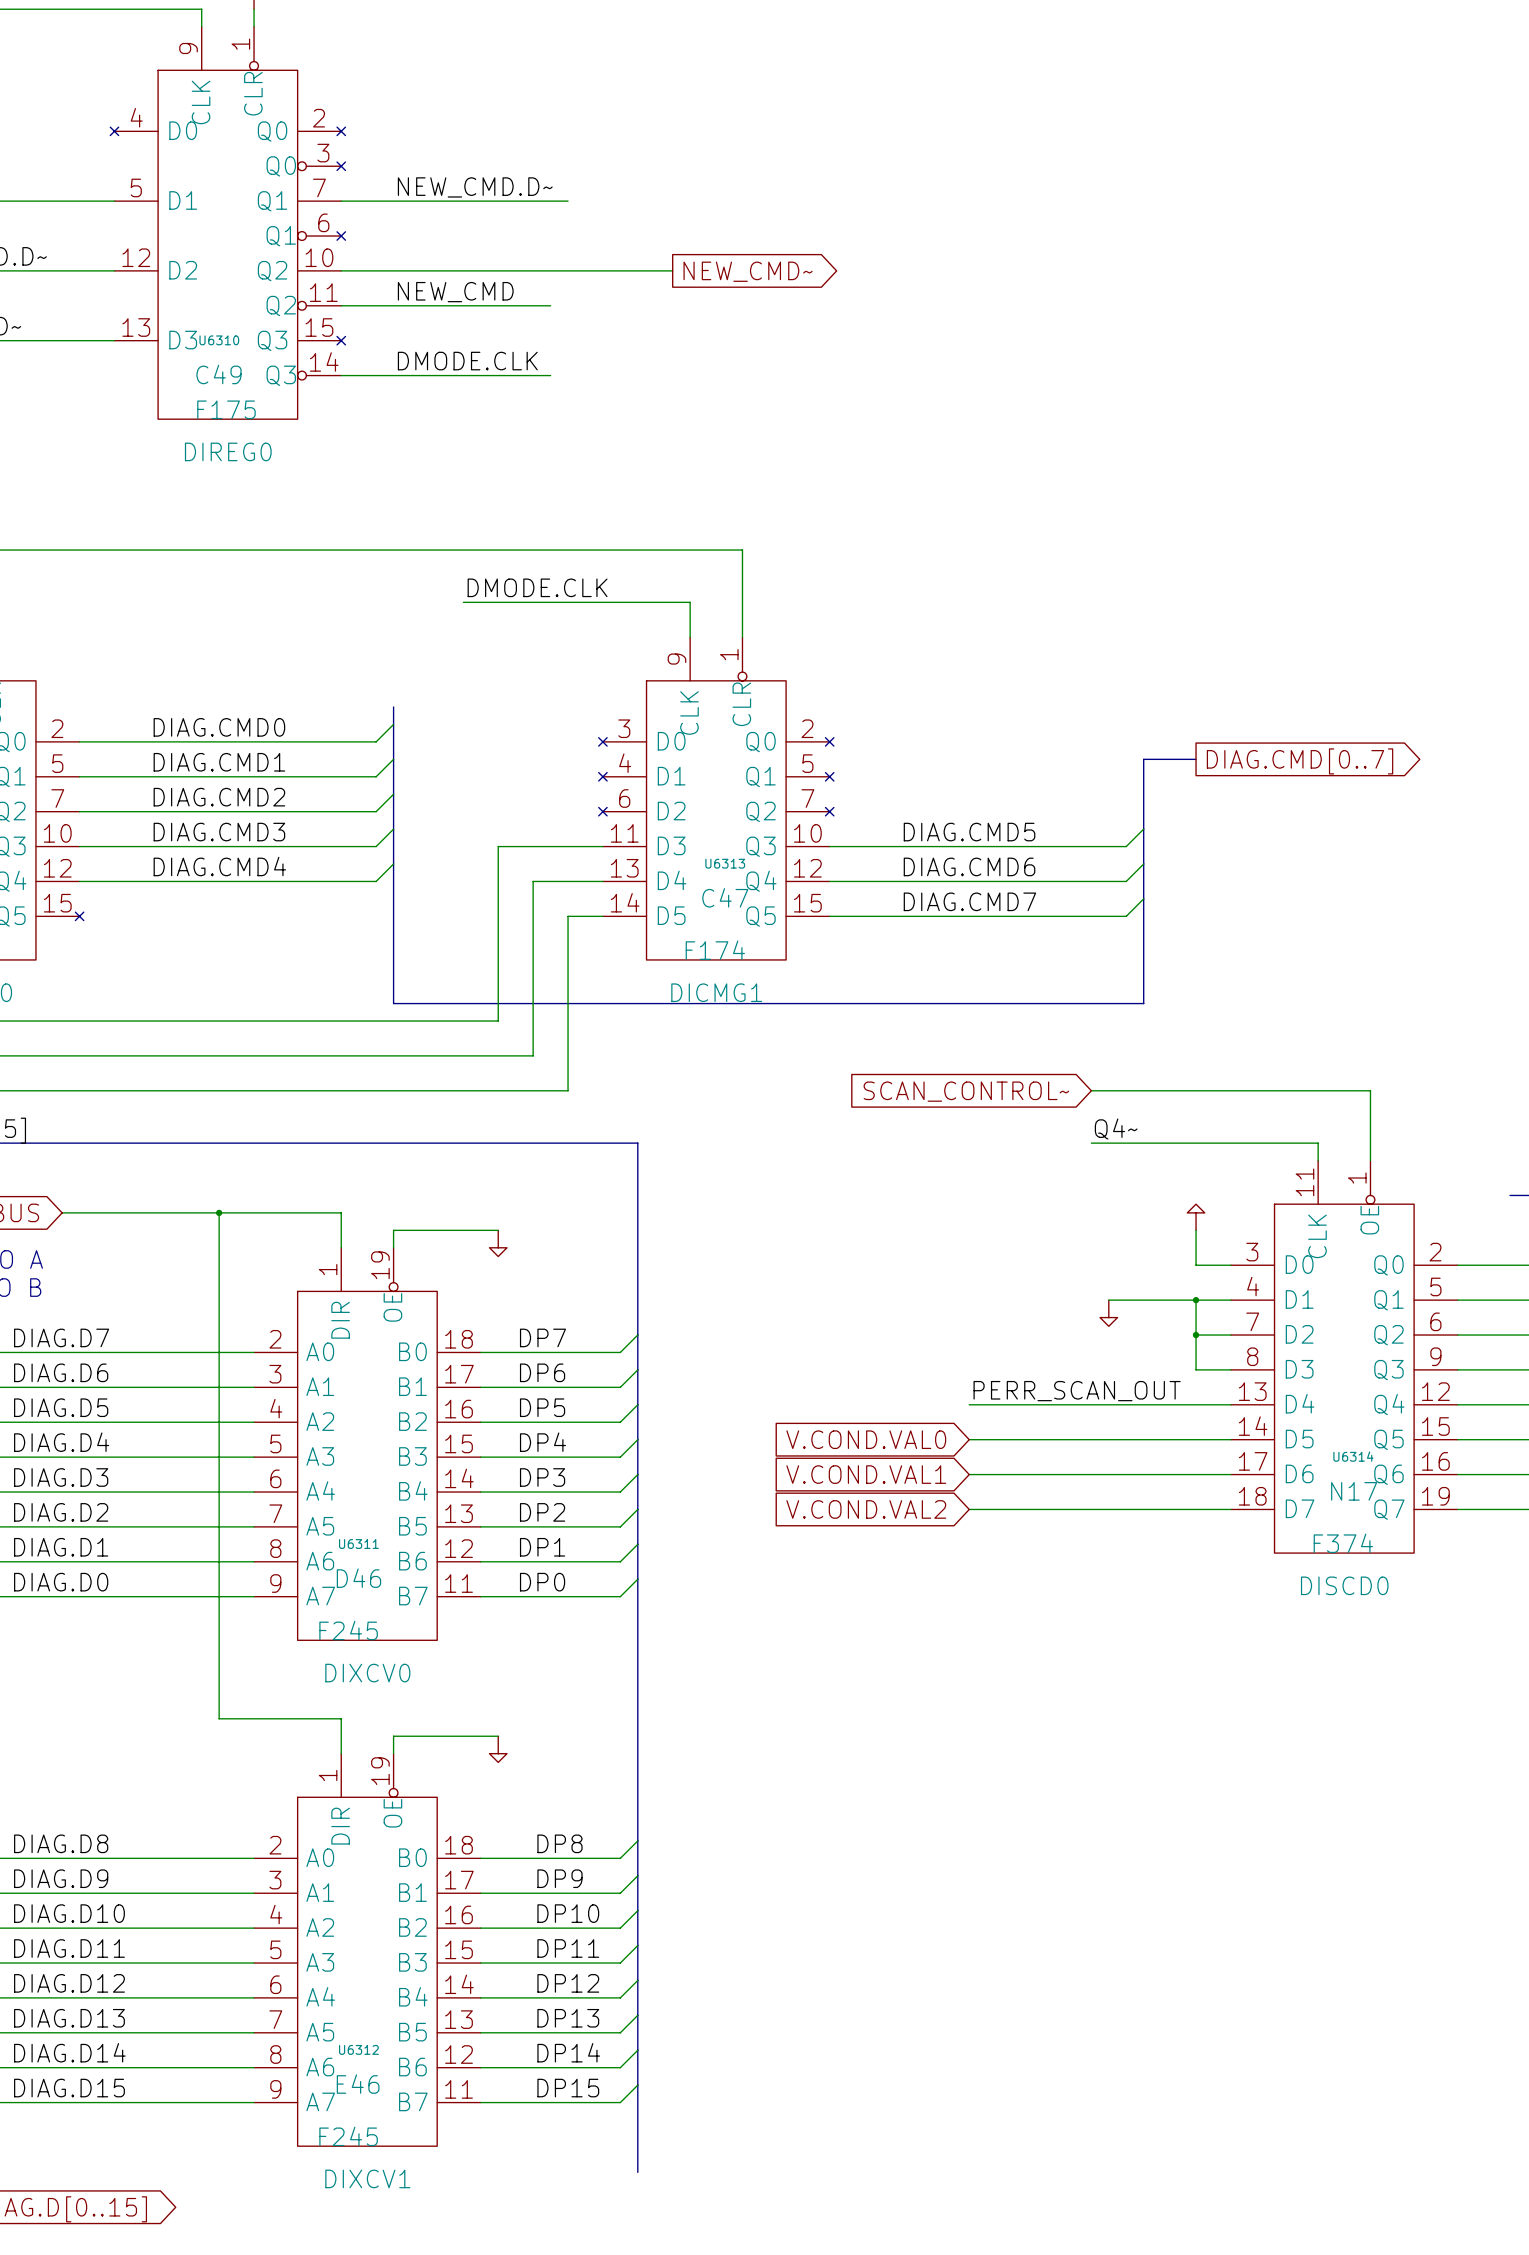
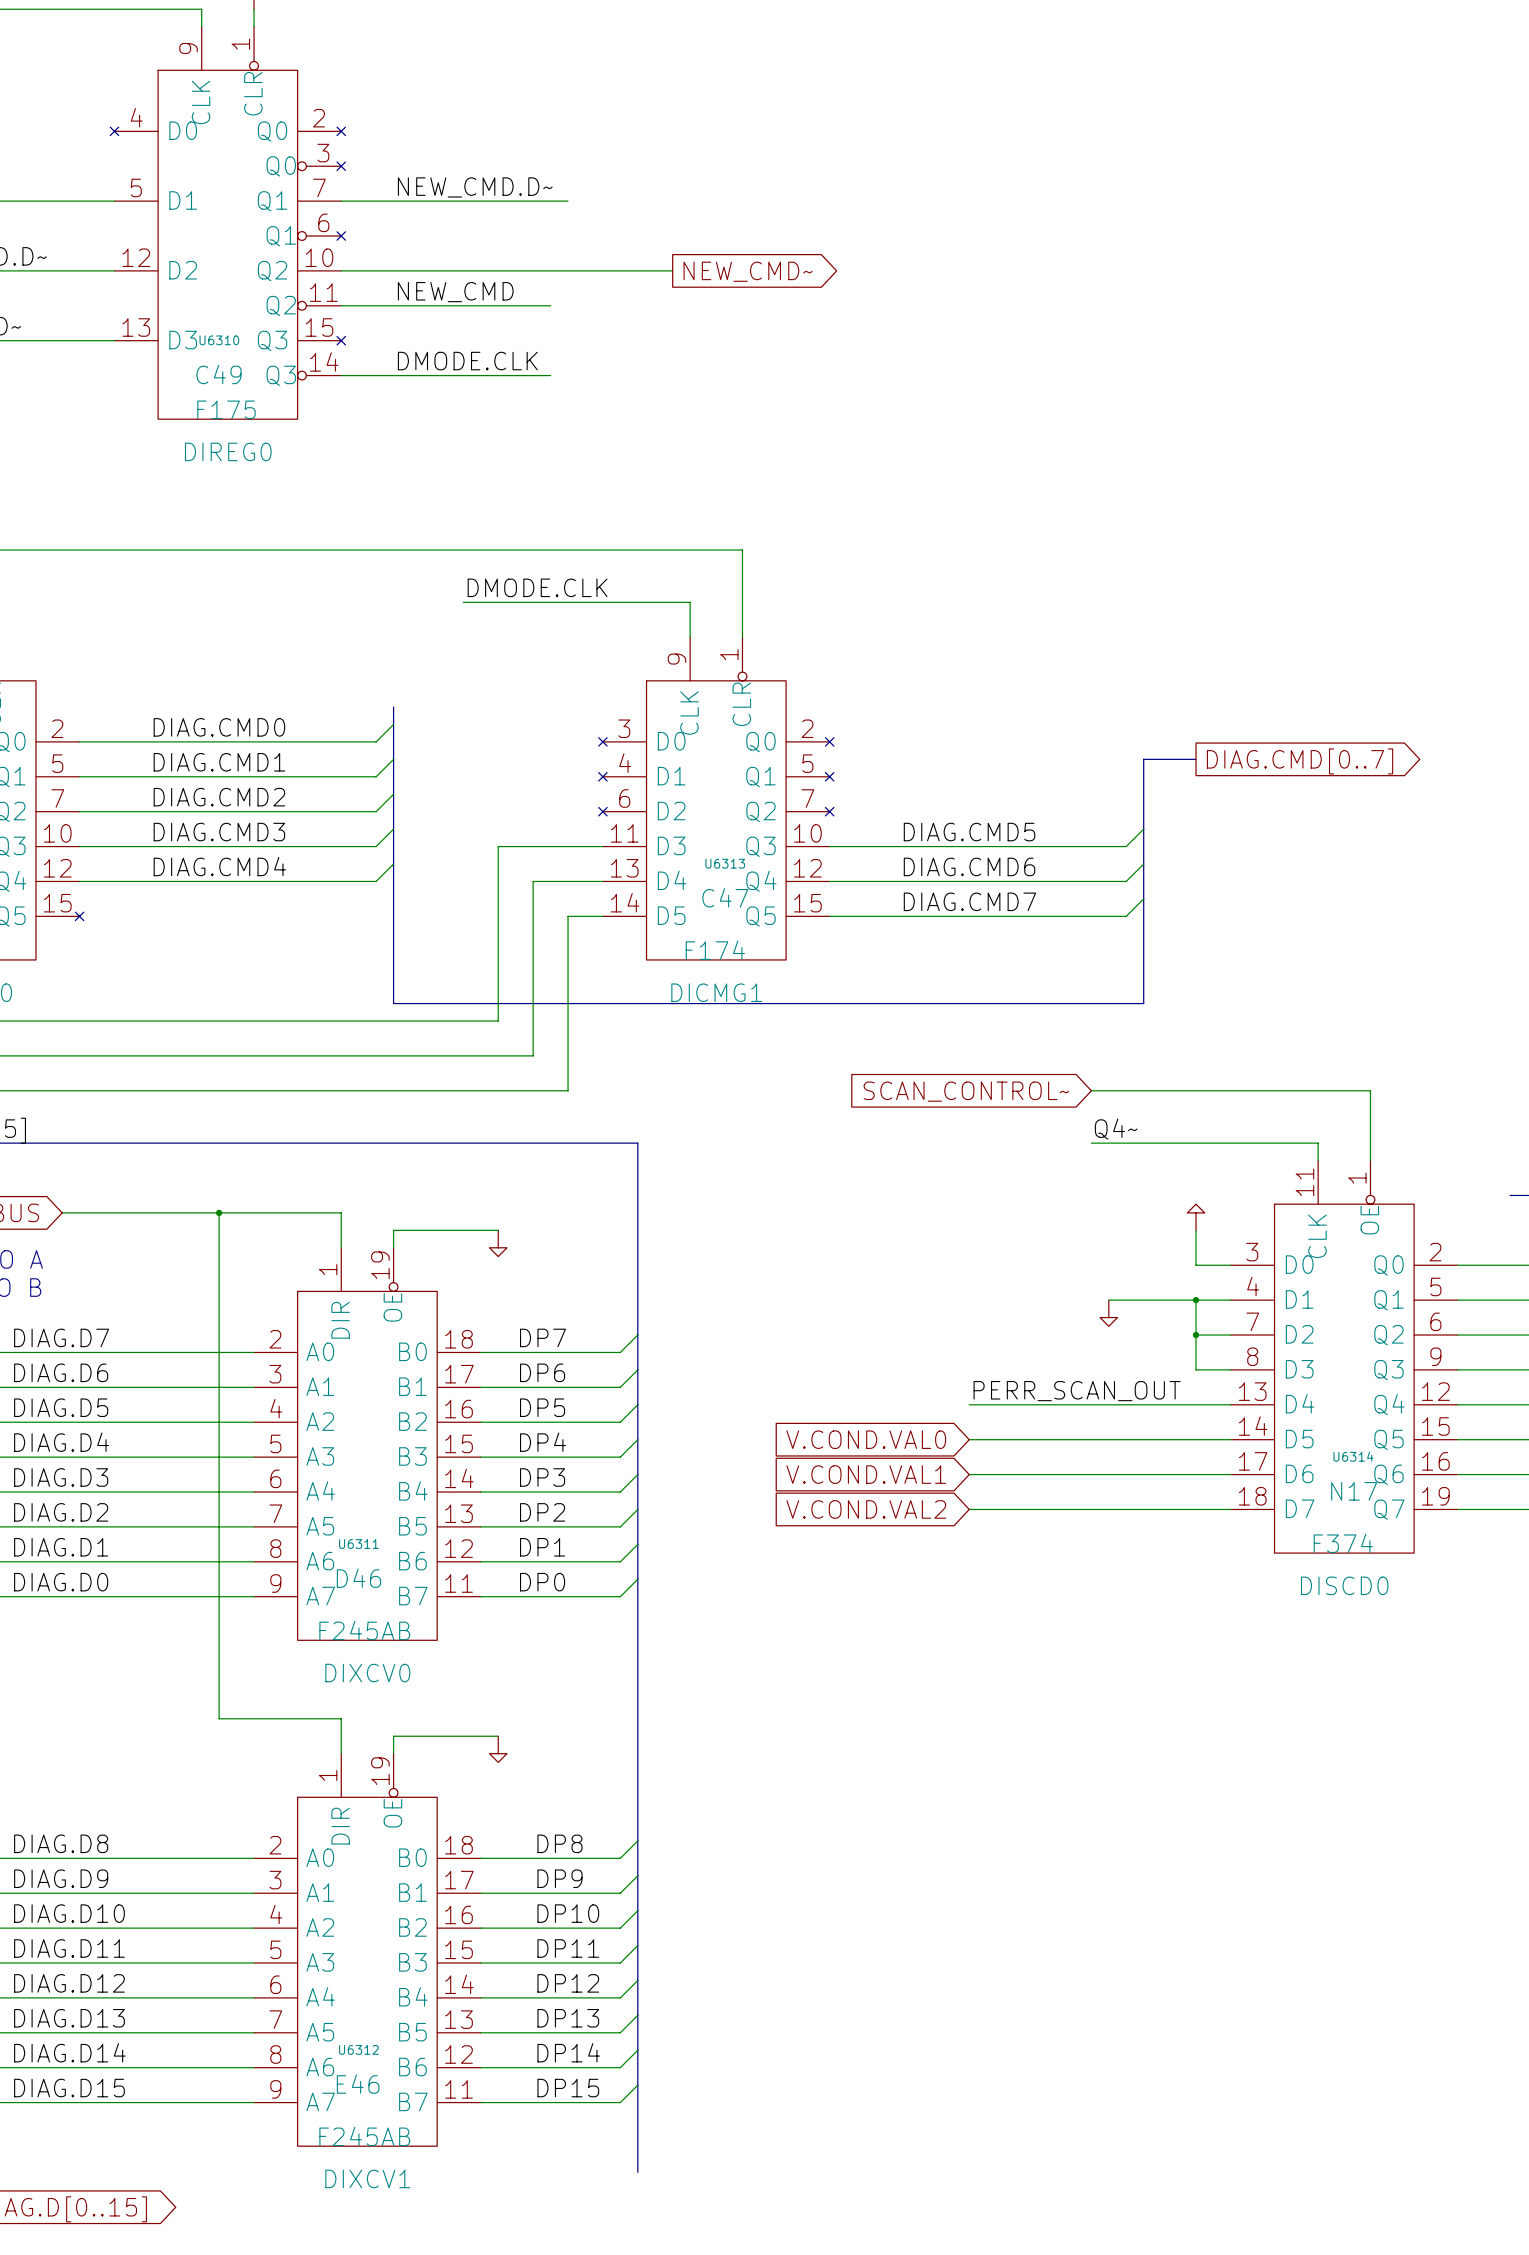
U6311 value: F245 (348, 1630) -> F245AB (364, 1630)
U6312 value: F245 (348, 2136) -> F245AB (364, 2136)

